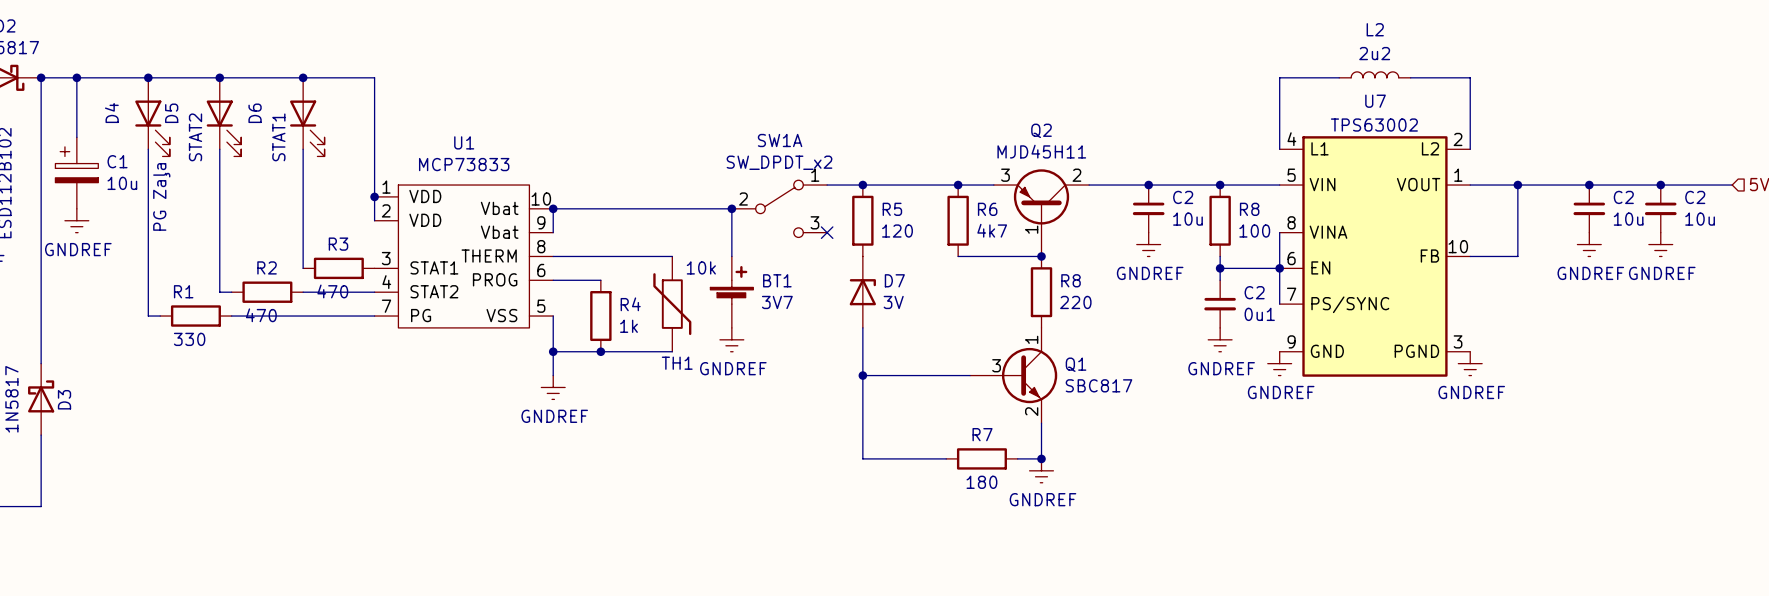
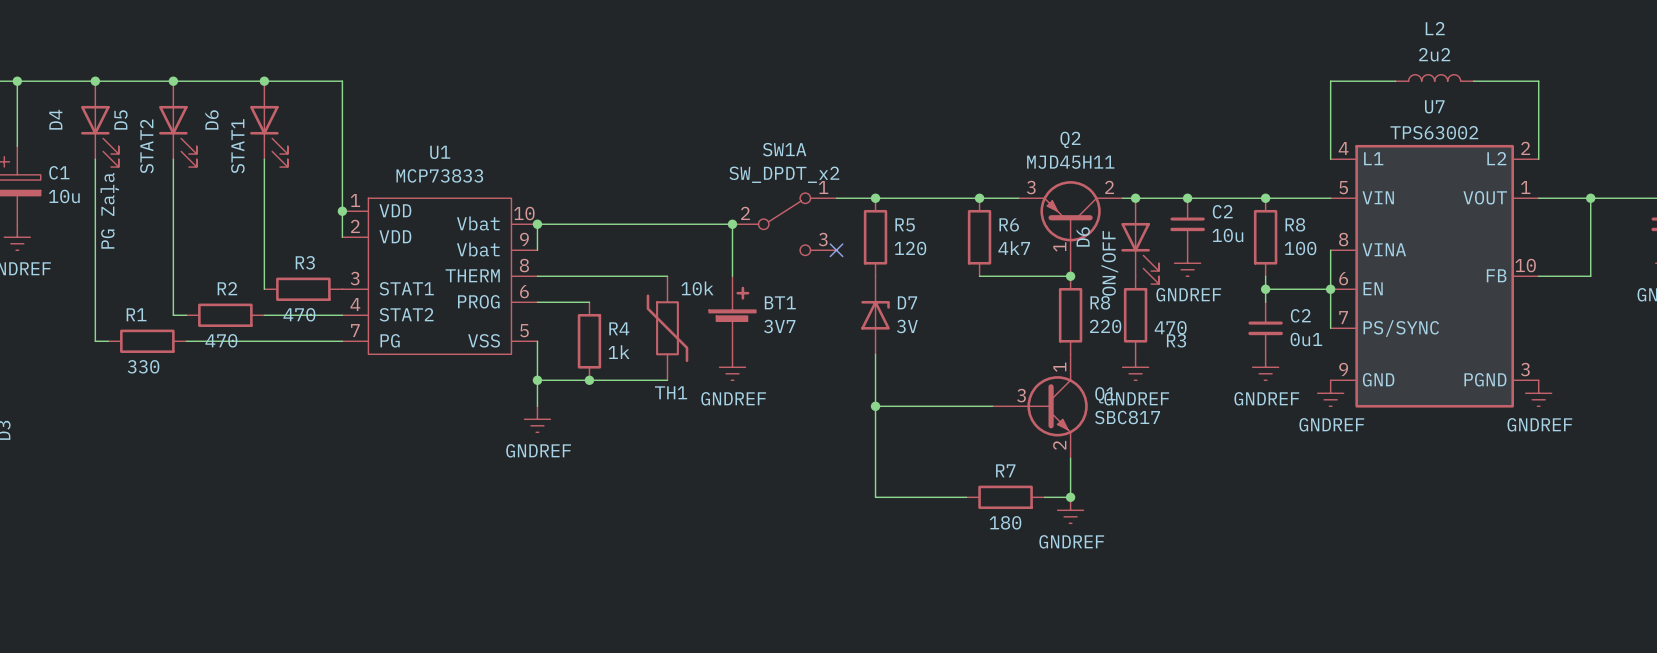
junction: none -> (1135, 198)
D6: none -> ON/OFF (1140, 241)
R3: none -> 470 (1135, 315)
power symbol: none -> GNDREF (1135, 367)

